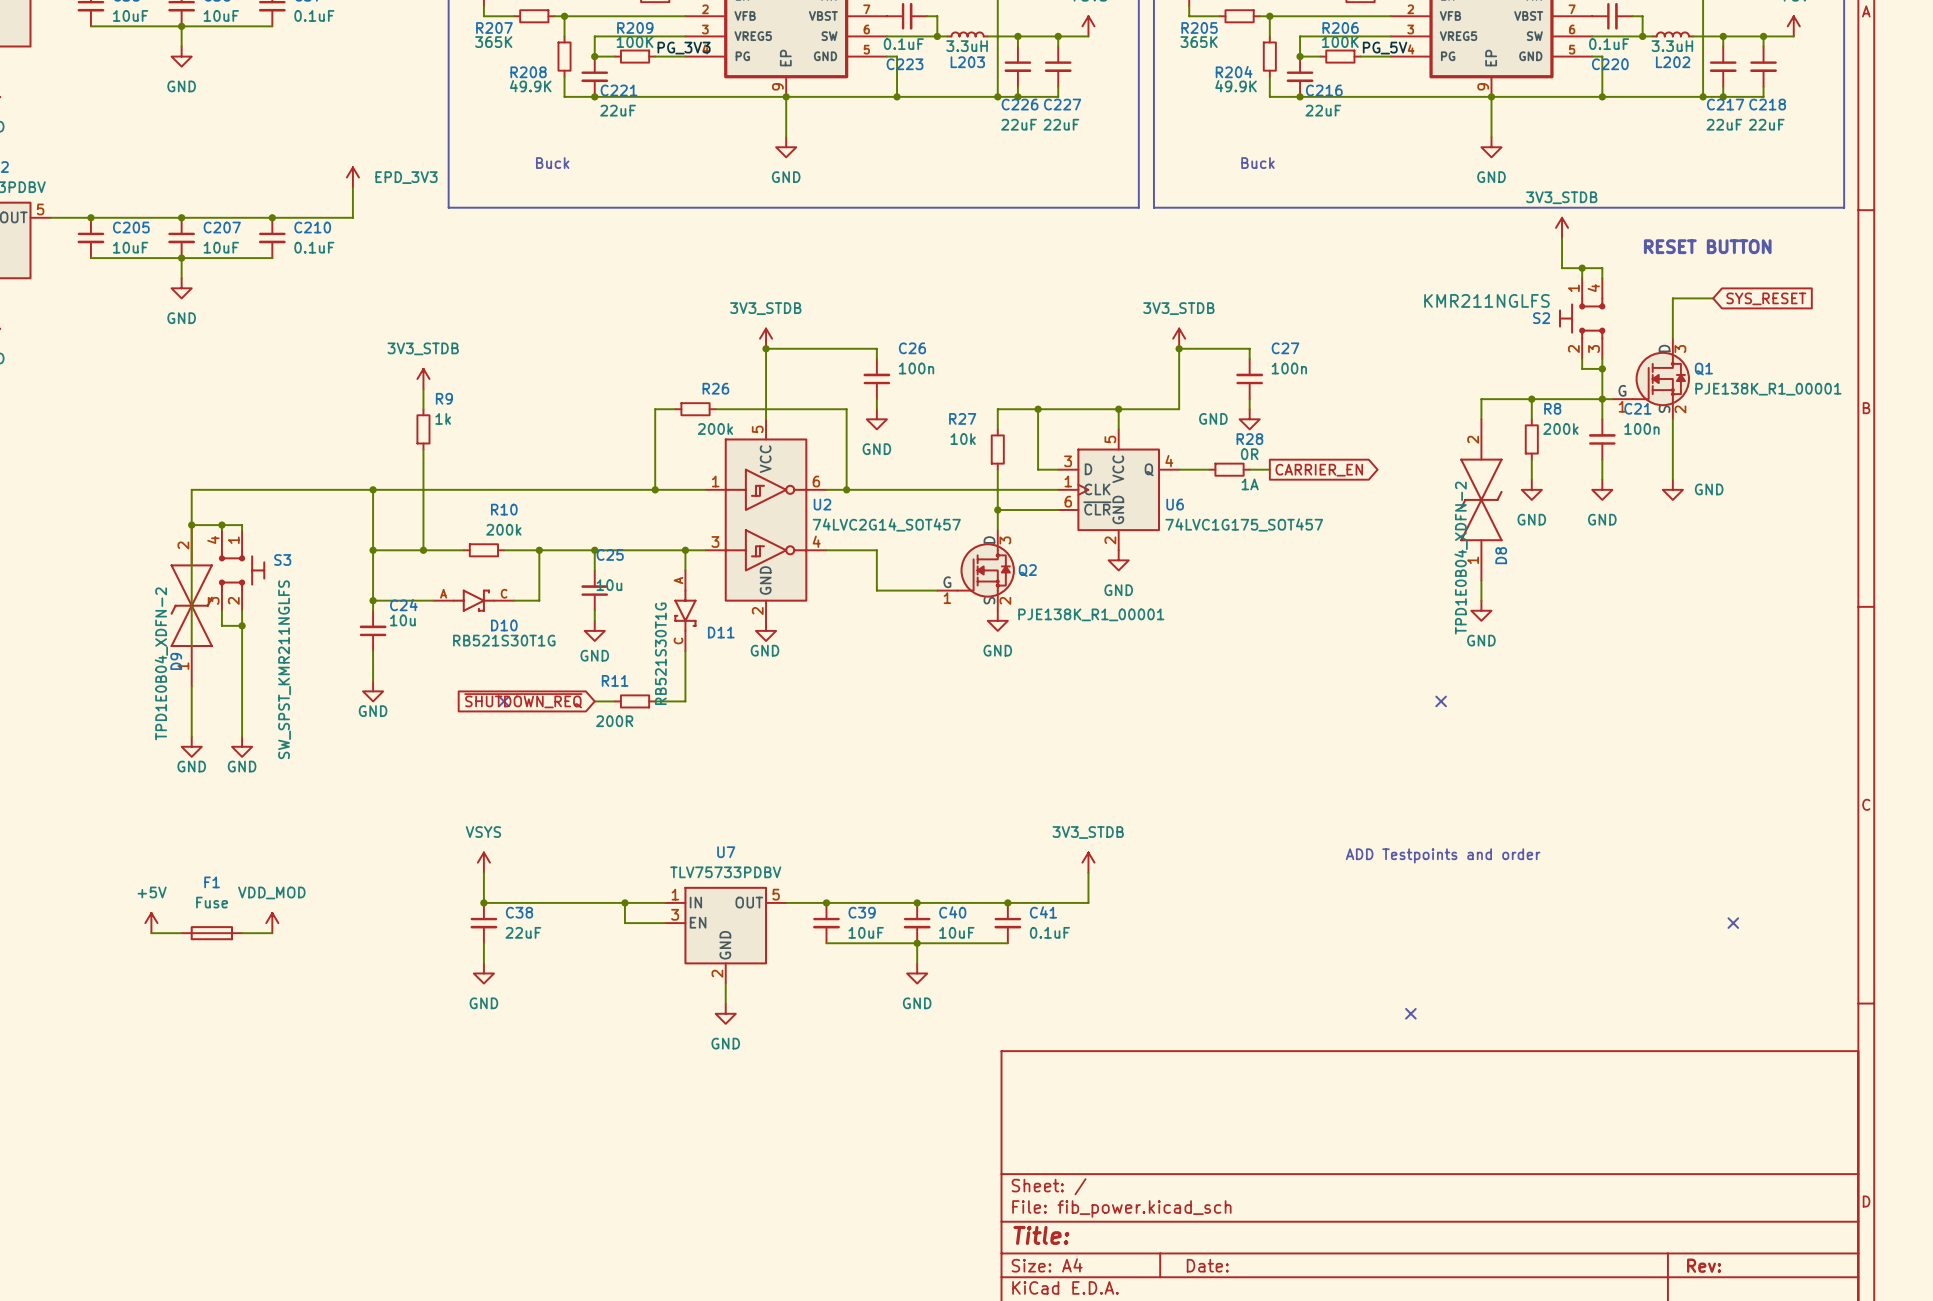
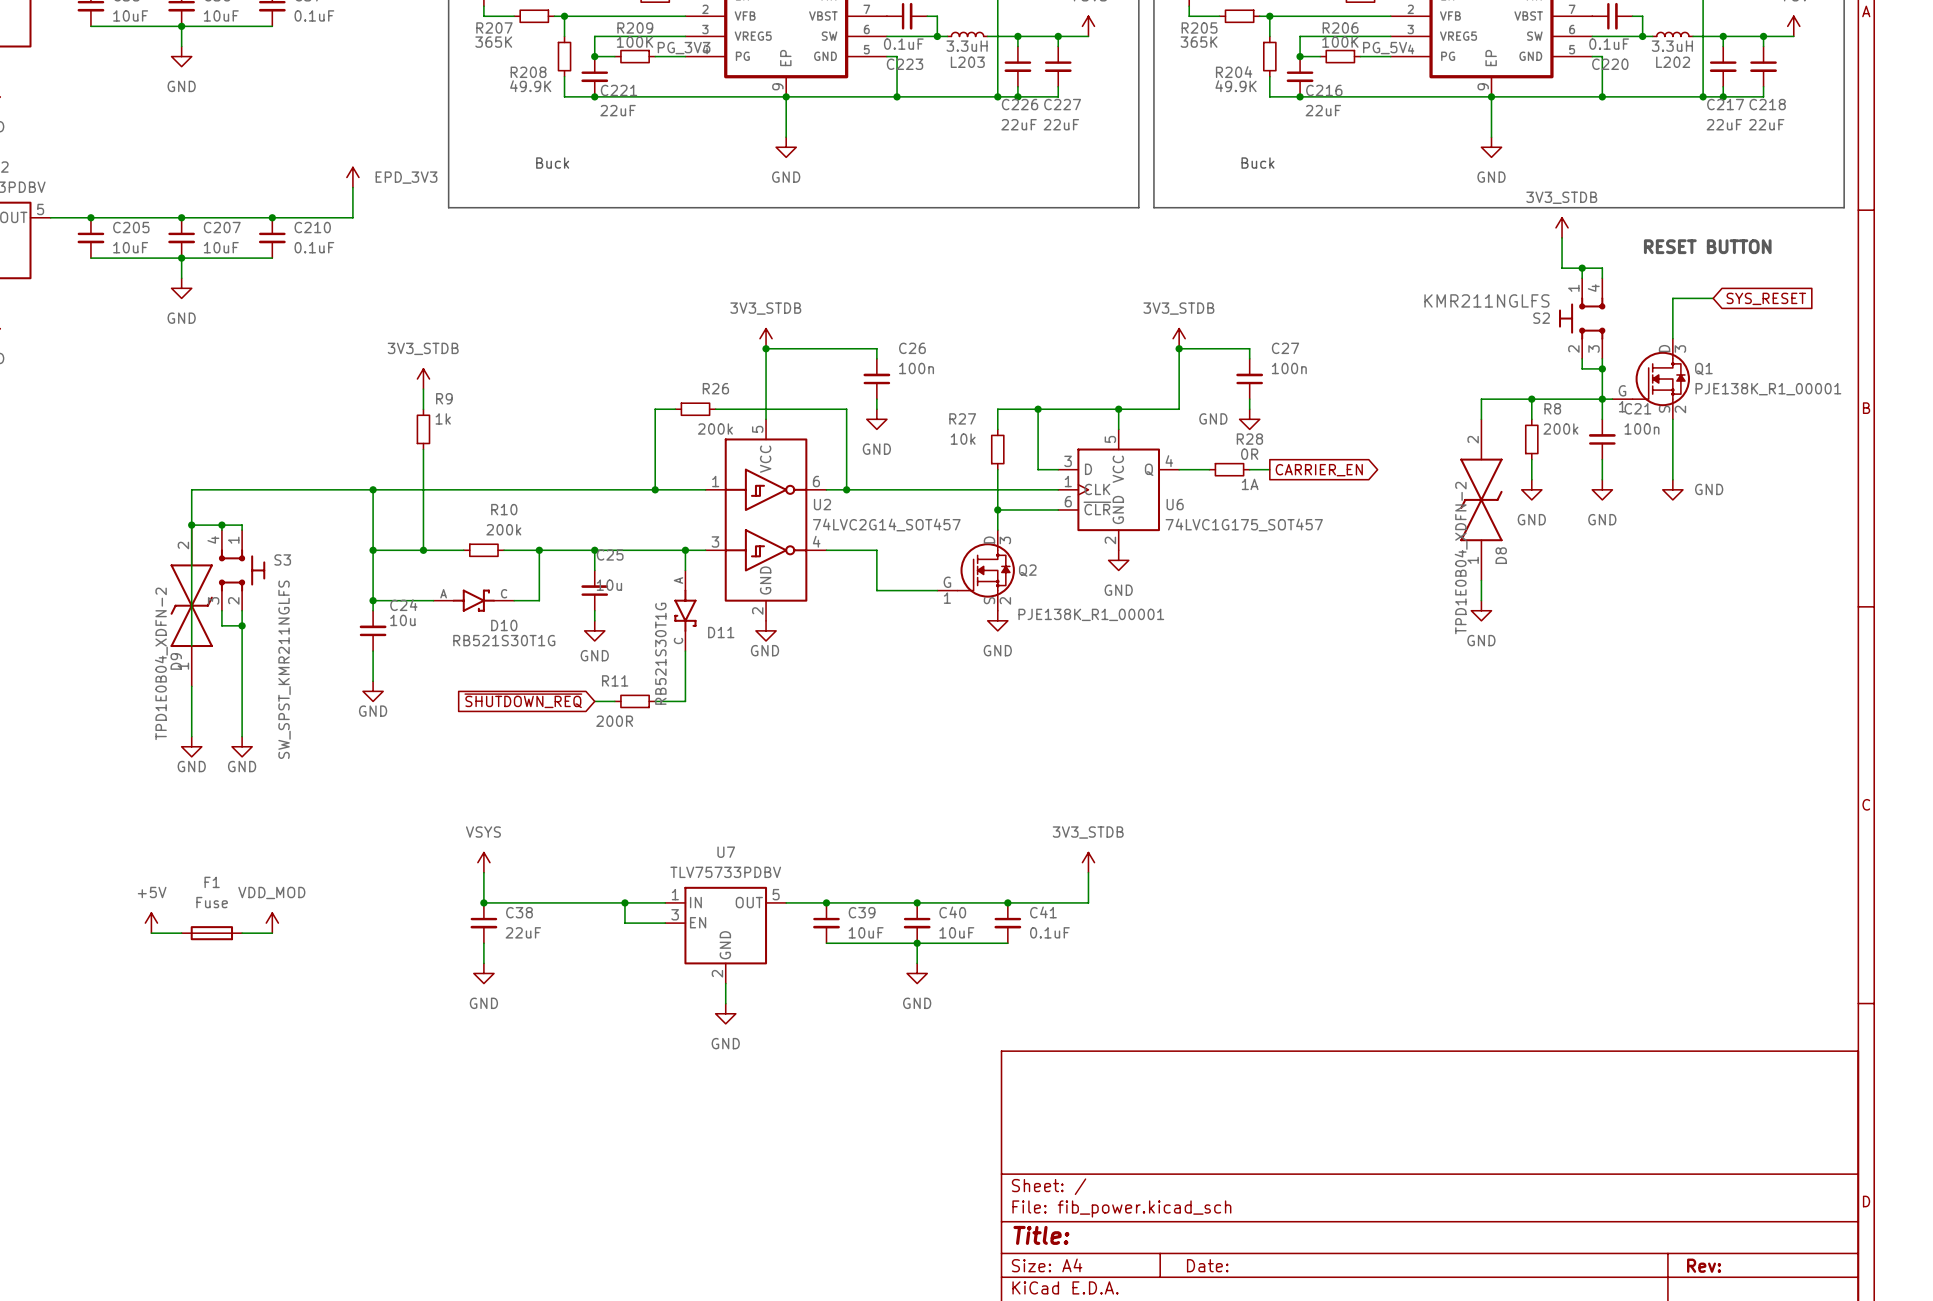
no-connect mark: (504, 701) -> none
no-connect mark: (1441, 701) -> none
text: ADD Testpoints and order (1443, 855) -> none
no-connect mark: (1733, 923) -> none
no-connect mark: (1410, 1013) -> none

